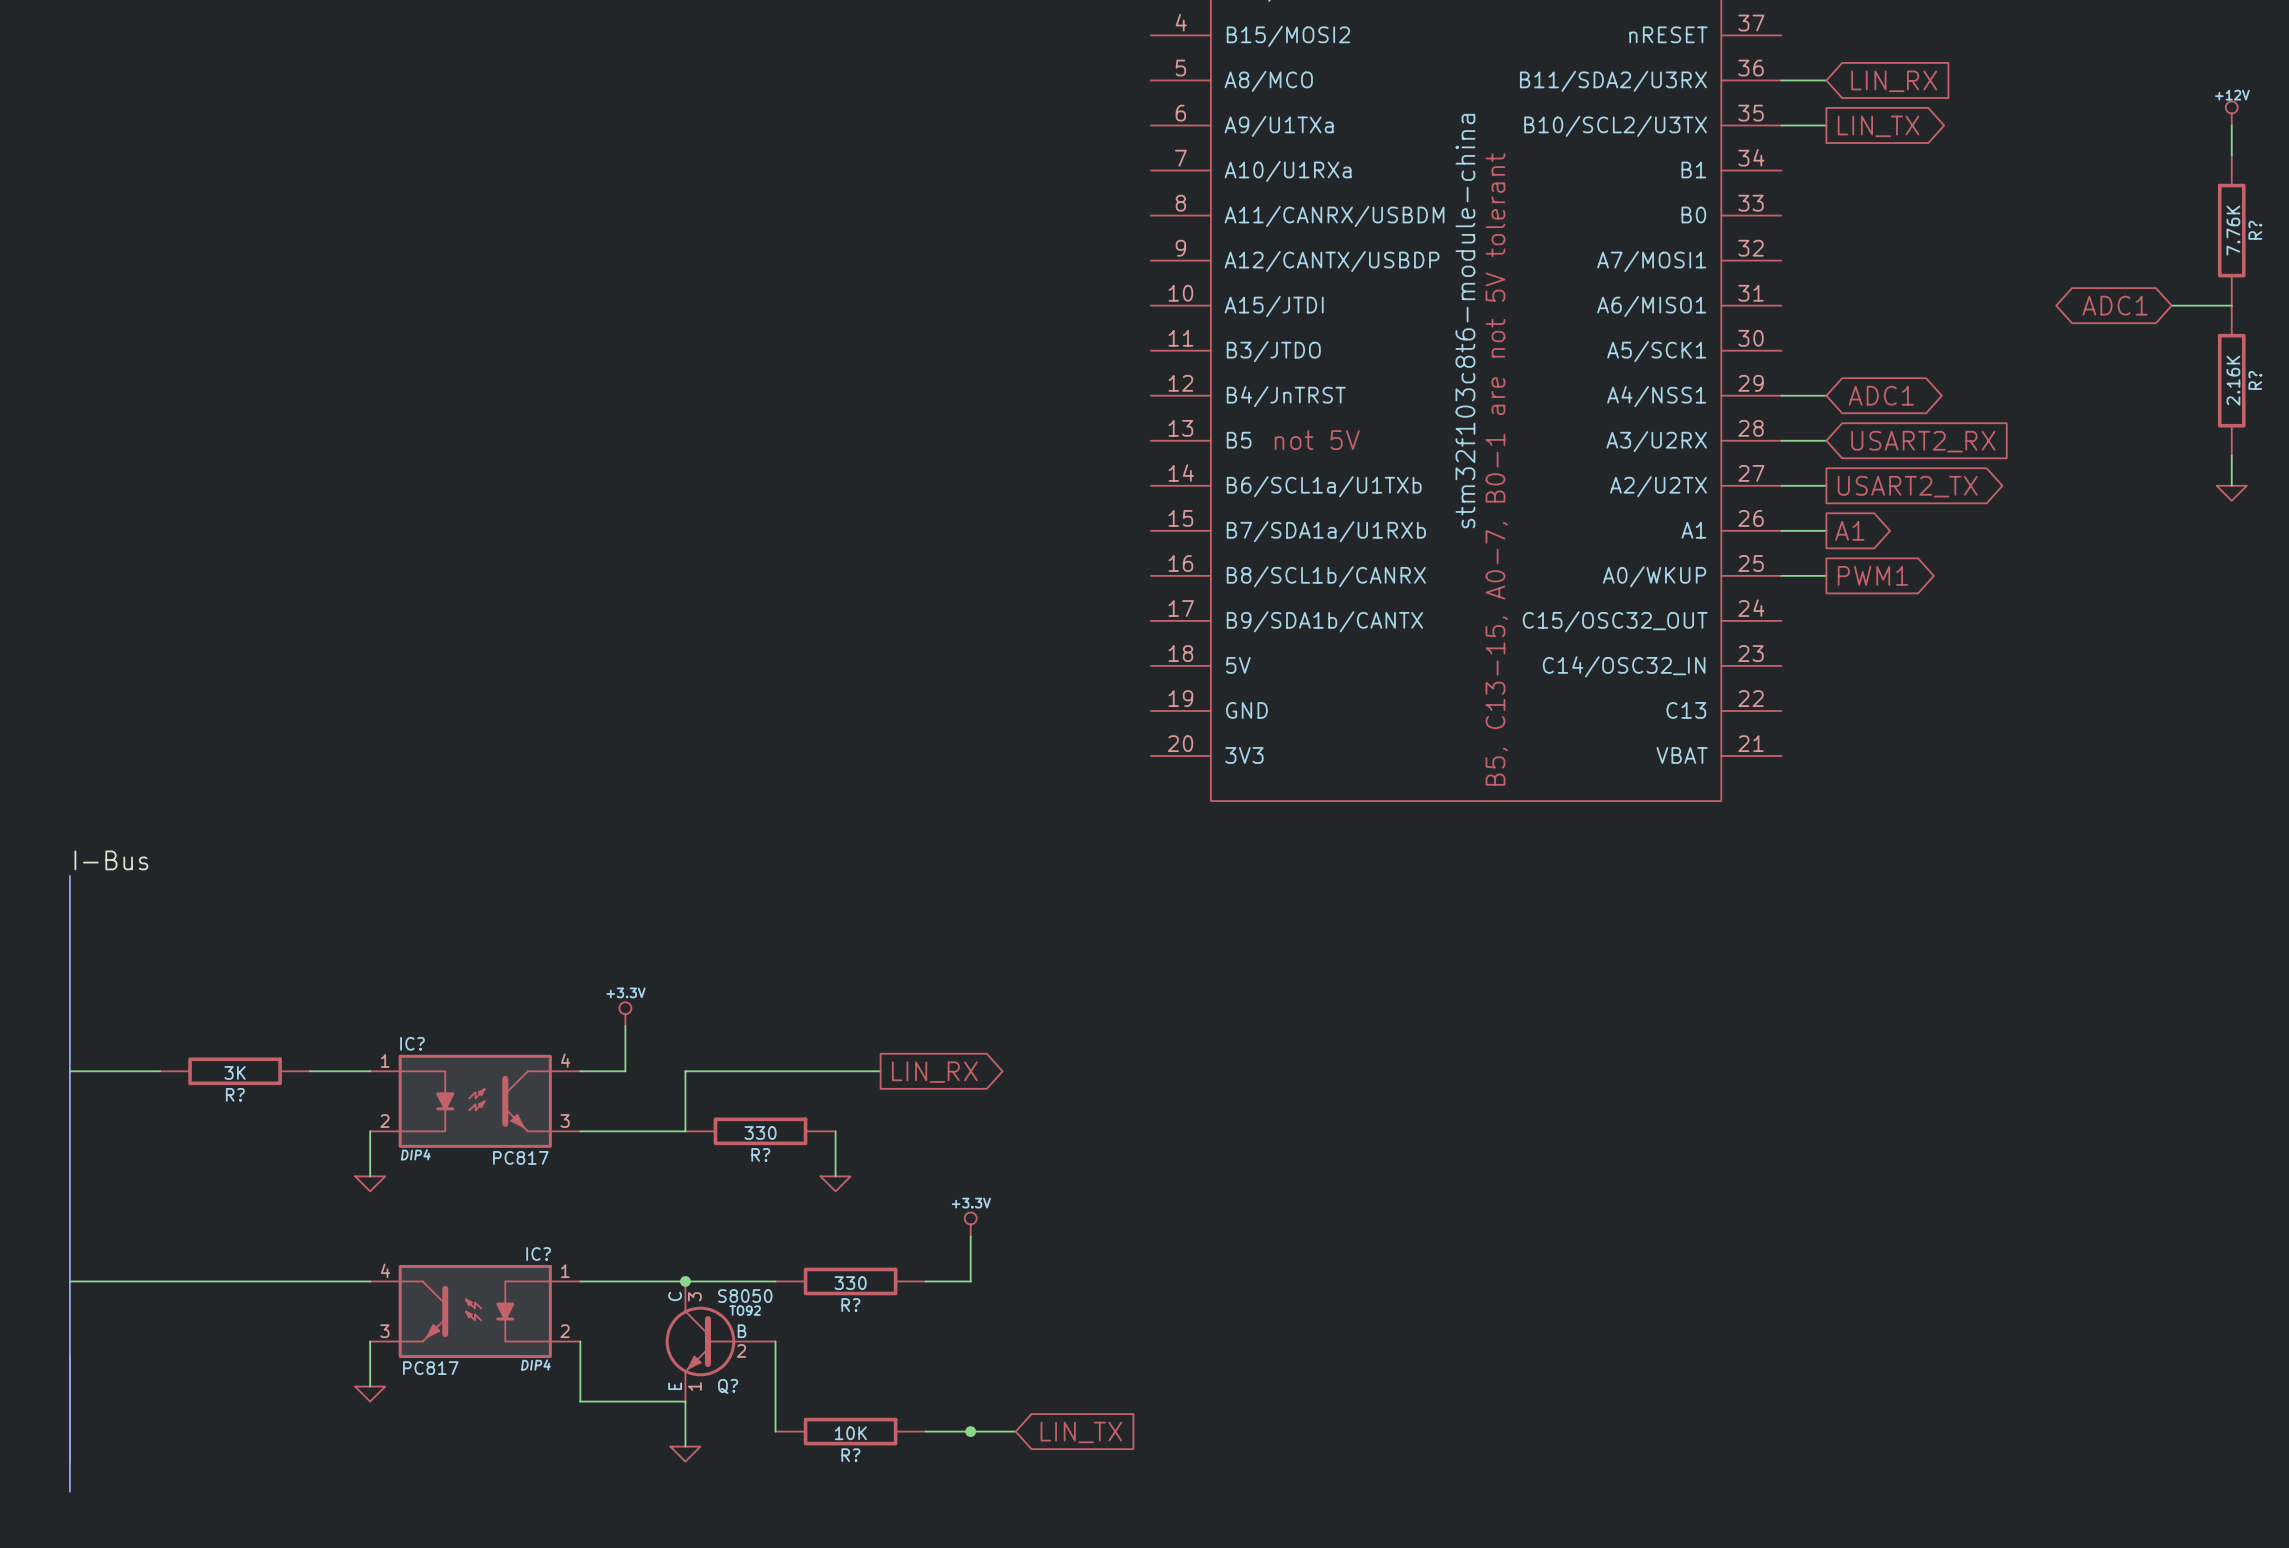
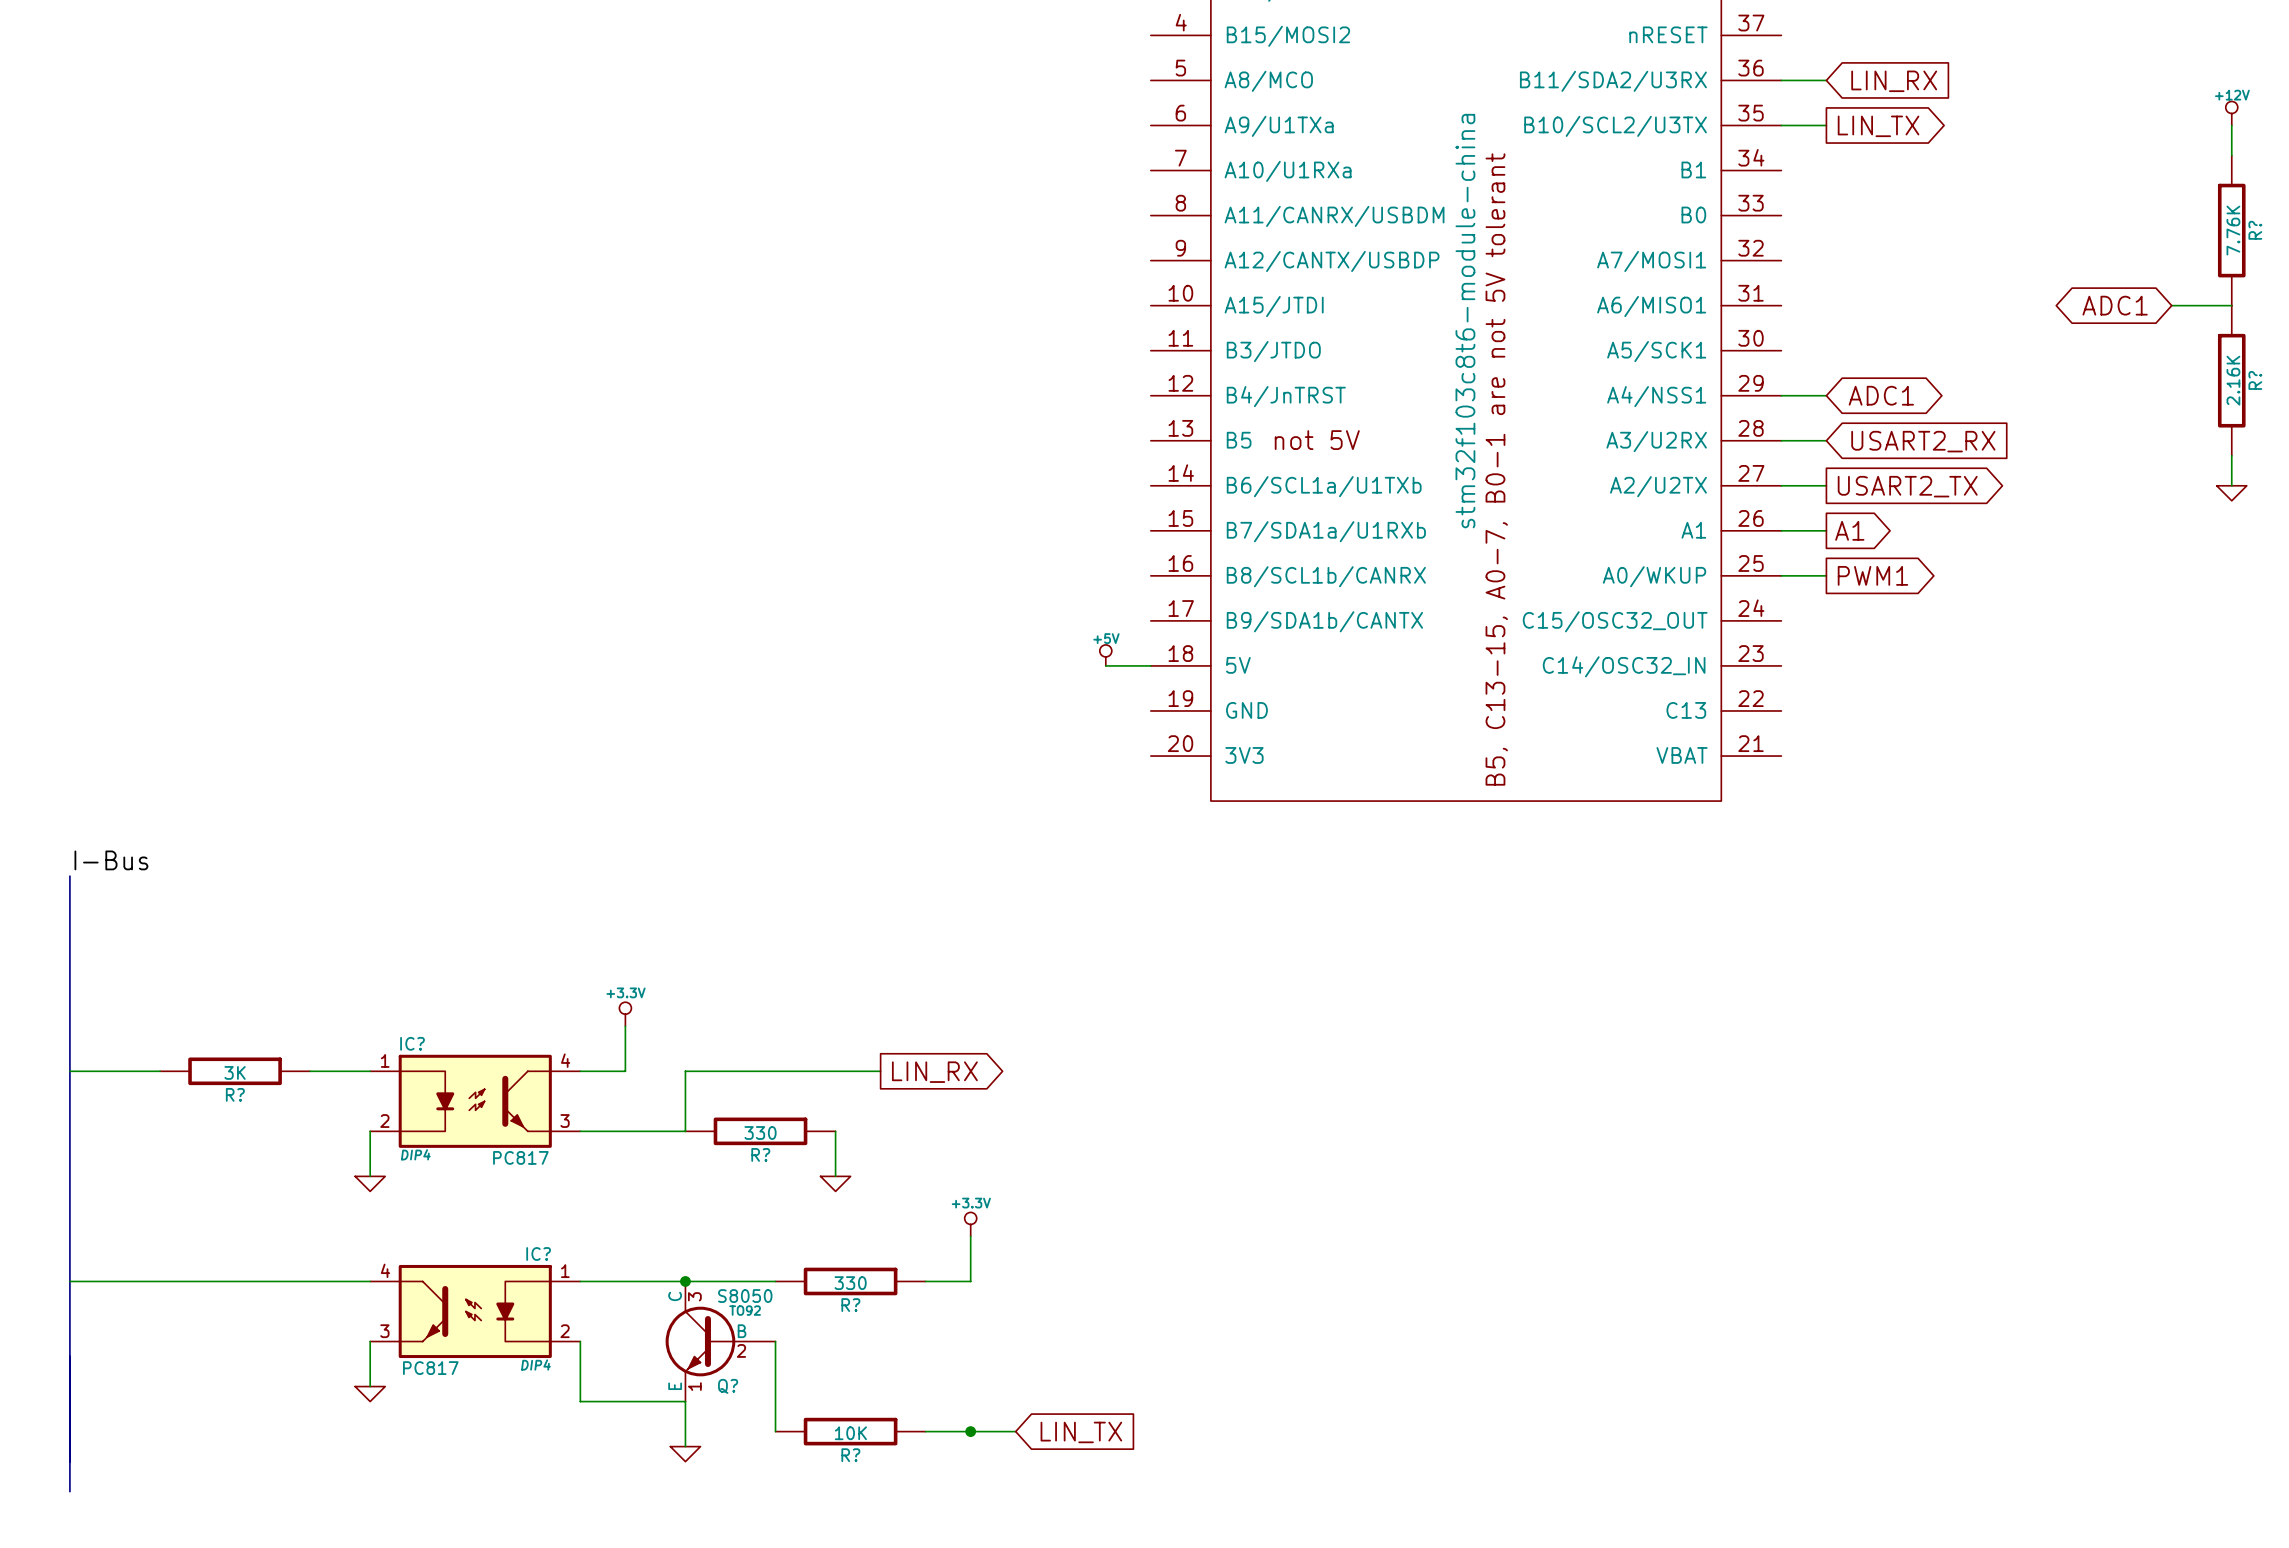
power symbol: none -> +5V (1105, 655)
wire: none -> (1105, 665) (1150, 665)

